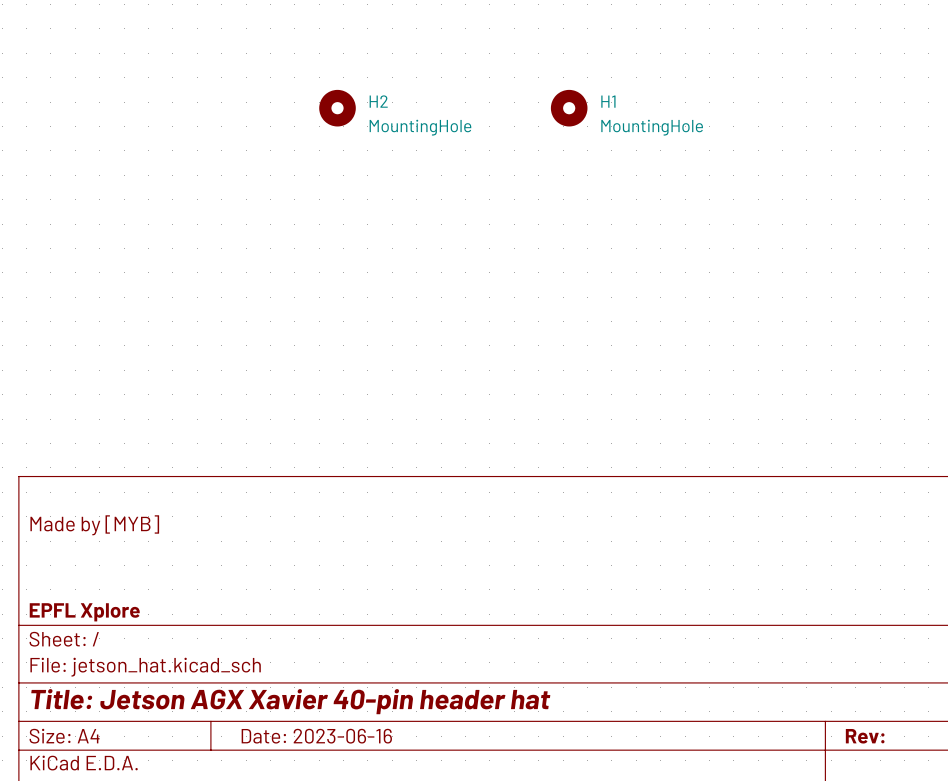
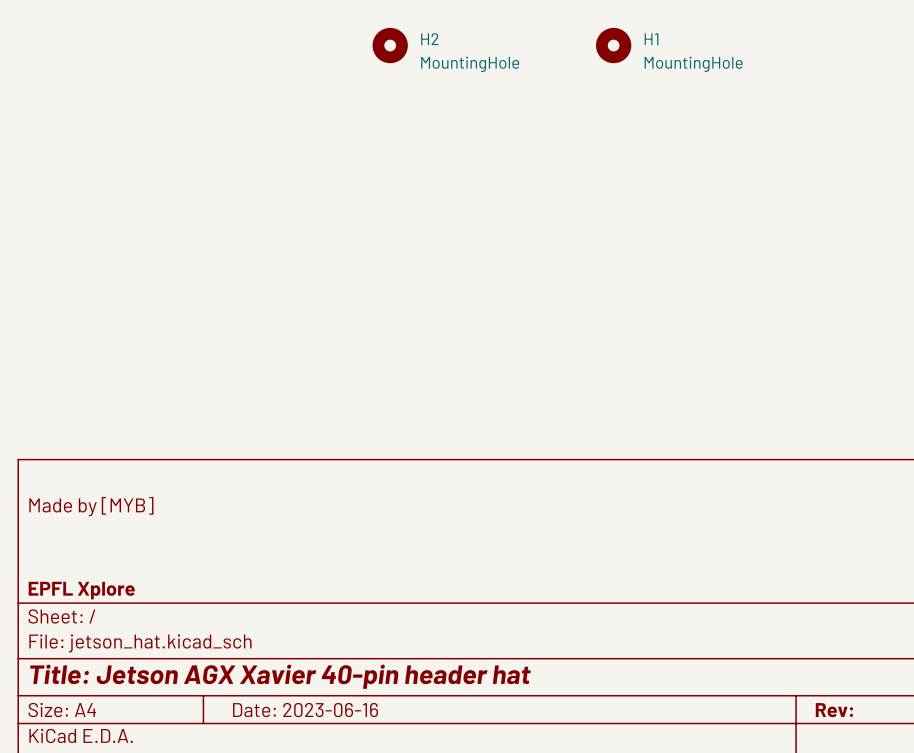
H2 position: (337, 108) -> (390, 45)
H1 position: (569, 108) -> (613, 45)

